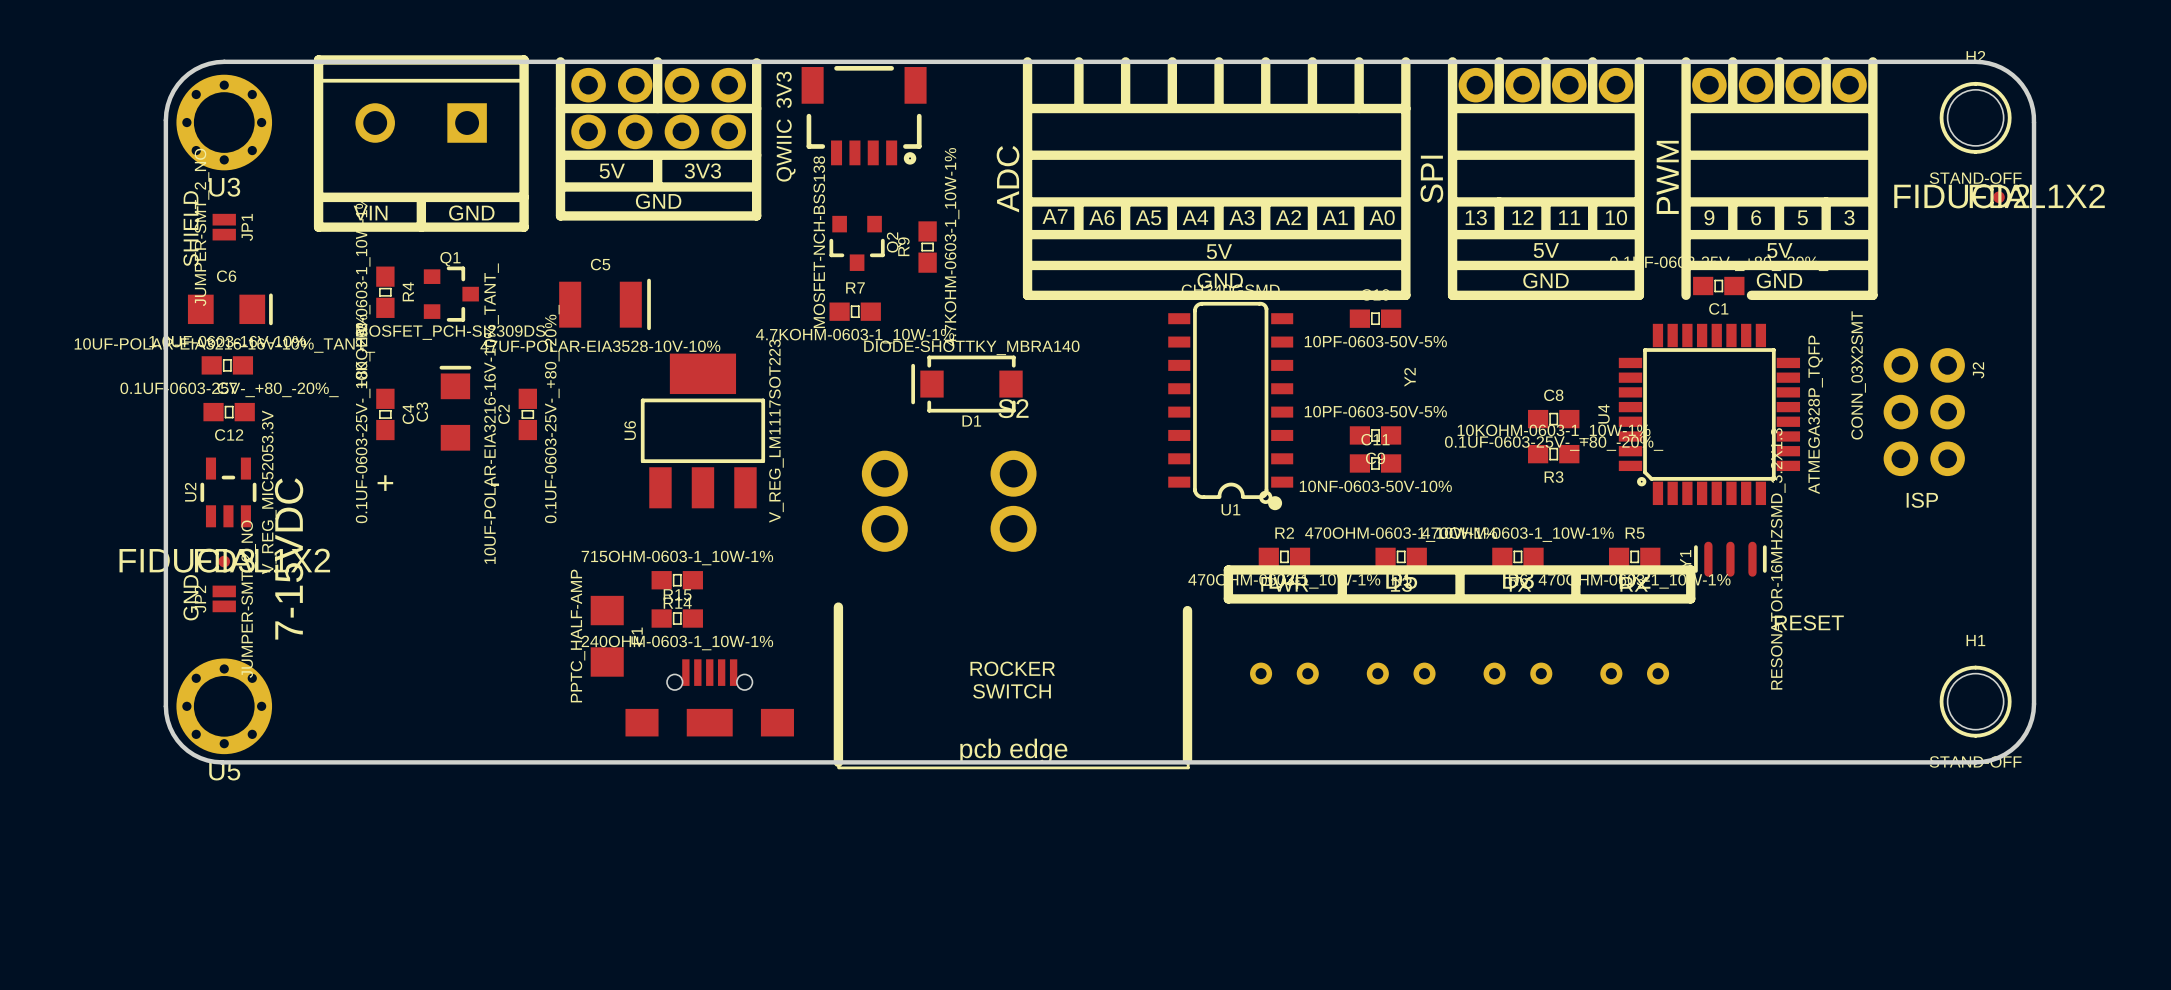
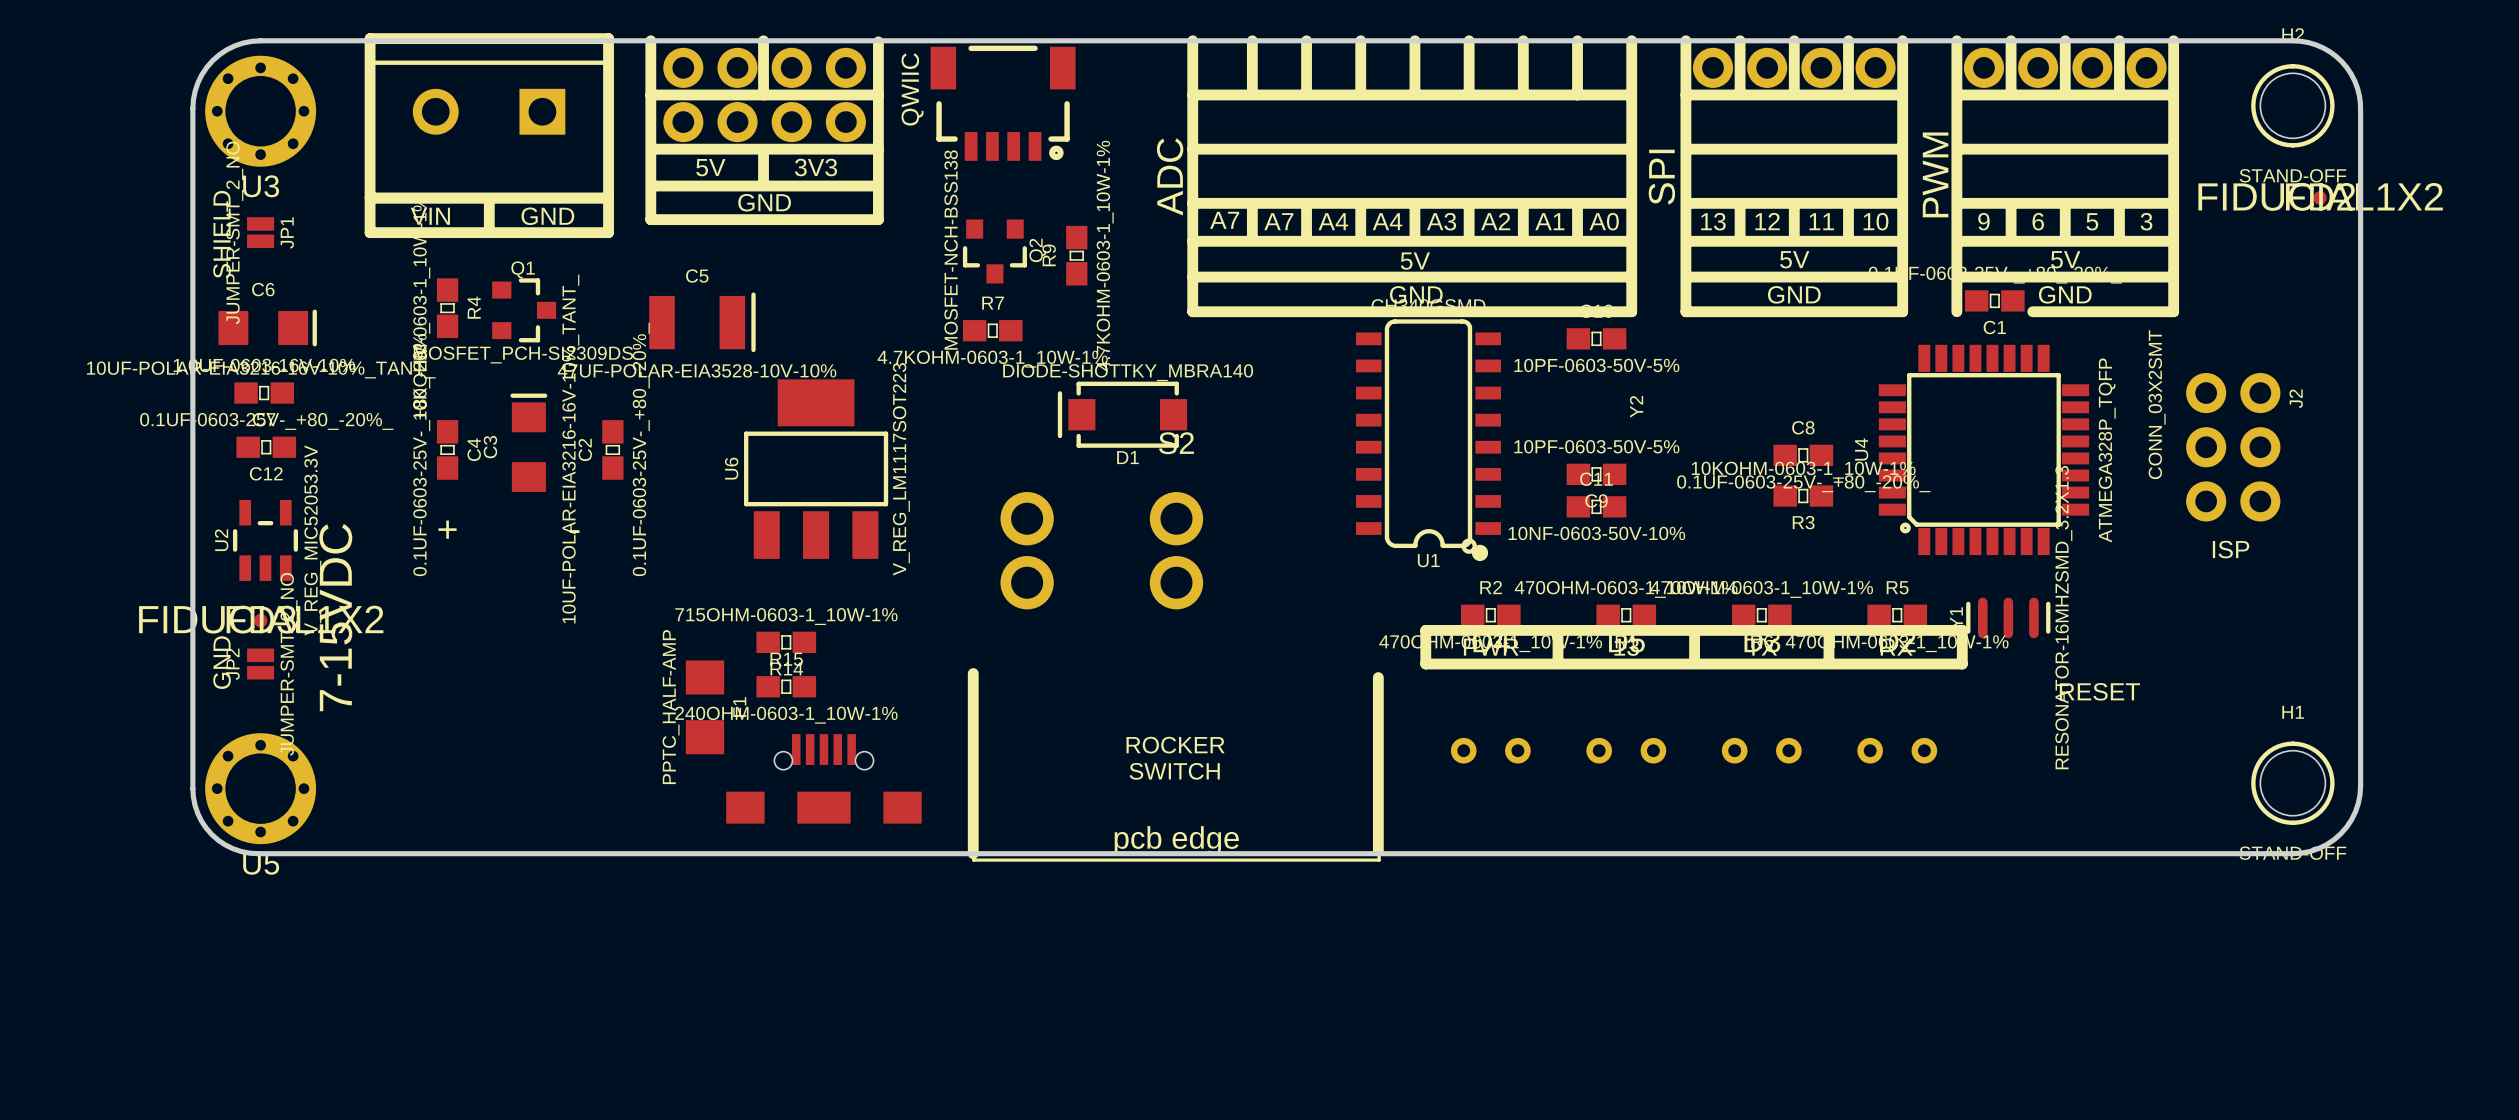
text: 3V3 (784, 89) -> QWIIC (912, 89)
text: QWIIC (786, 150) -> none
text: A6 (1101, 217) -> A7 (1278, 221)
text: A5 (1148, 217) -> A4 (1333, 221)

